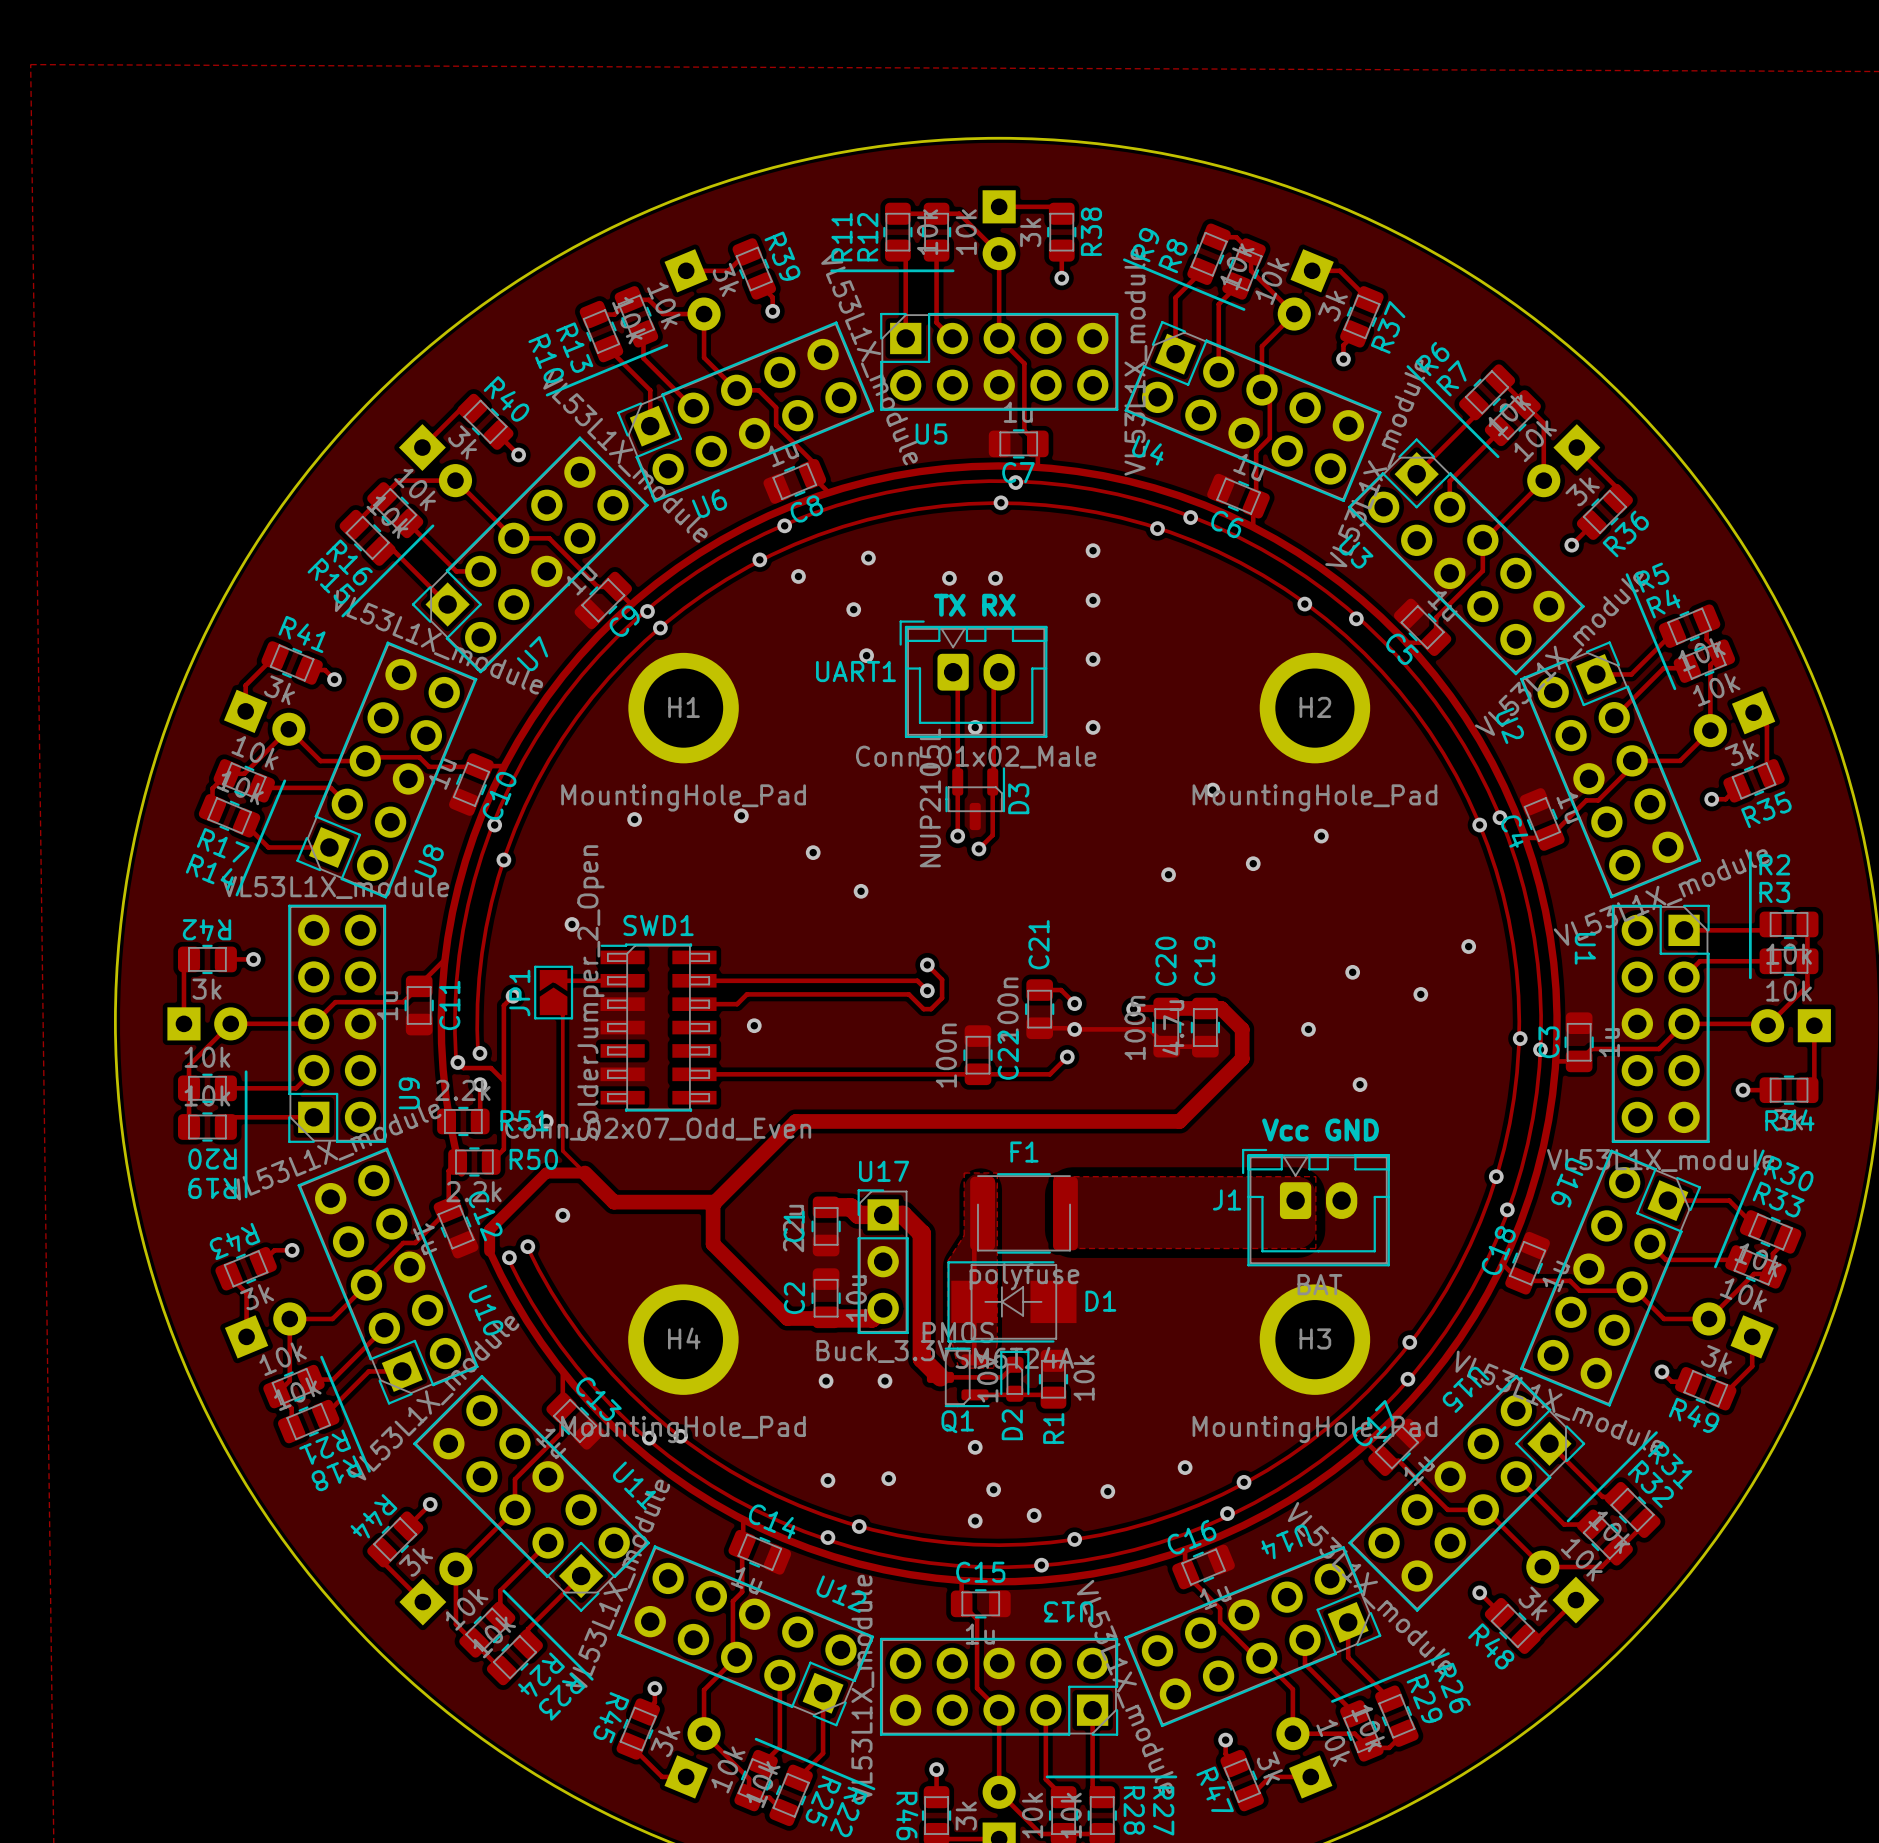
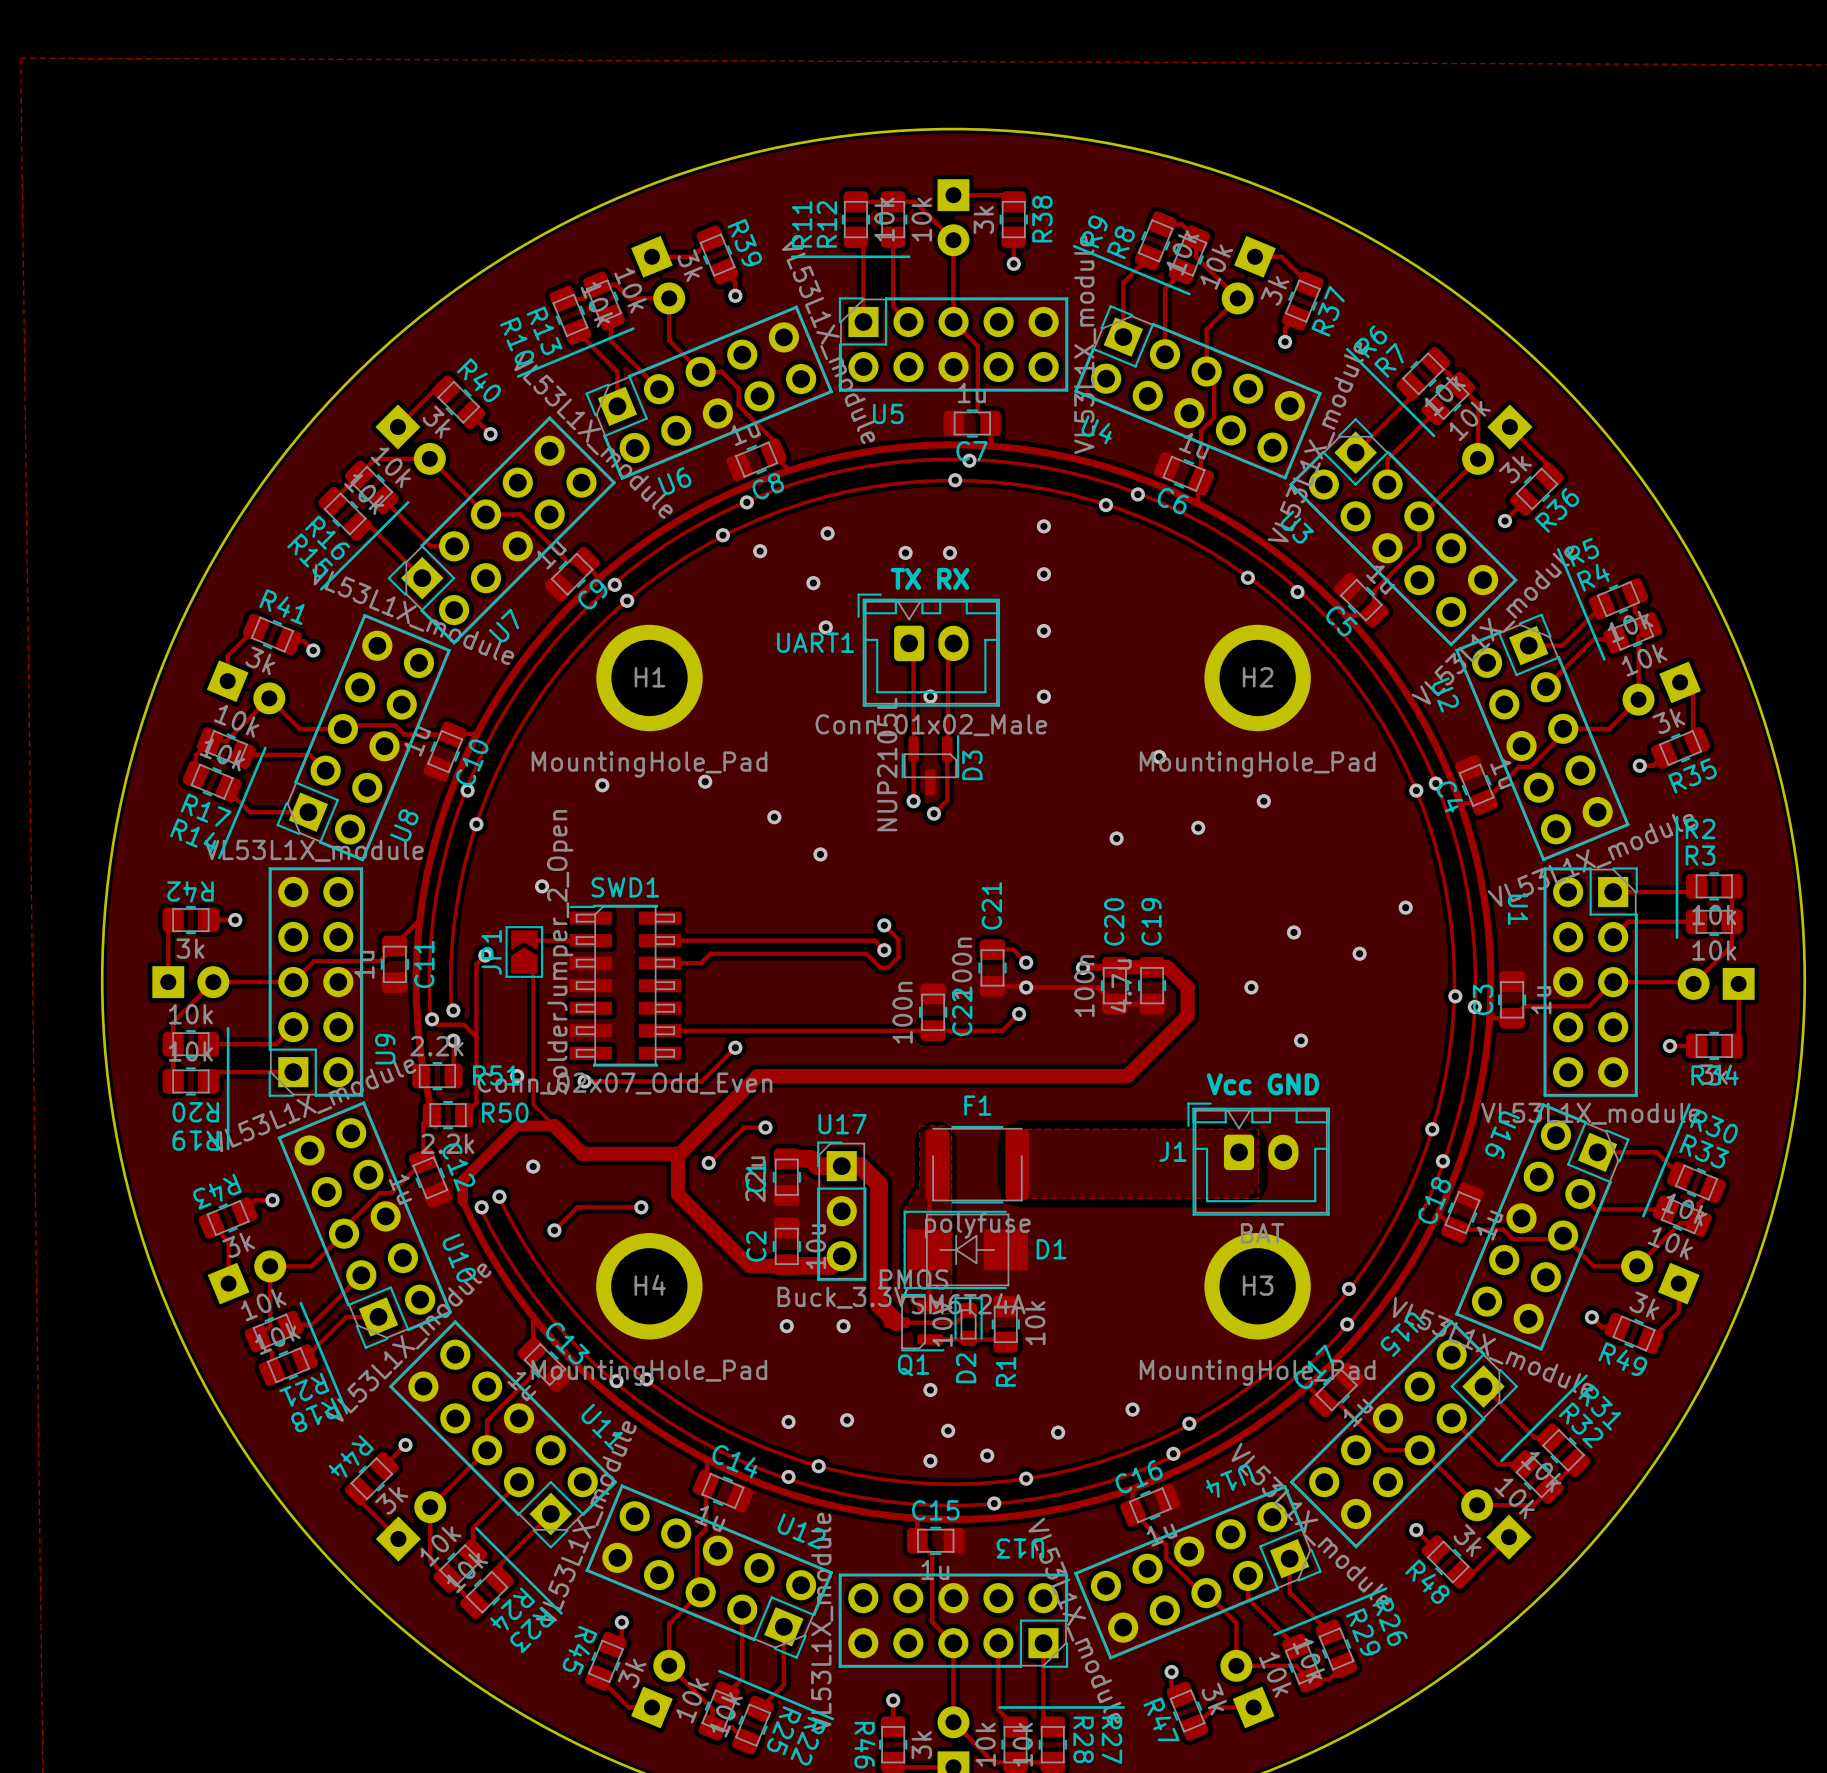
via position: (754, 1025) -> (735, 1047)
track: none -> (735, 1047) (701, 1081) (584, 1081)
via: none -> (584, 1081)
track: none -> (765, 1127) (744, 1127) (708, 1163)
via: none -> (765, 1127)
via: none -> (708, 1163)
track: none -> (641, 1207) (577, 1207) (554, 1230)
via: none -> (641, 1207)
via: none -> (554, 1230)

